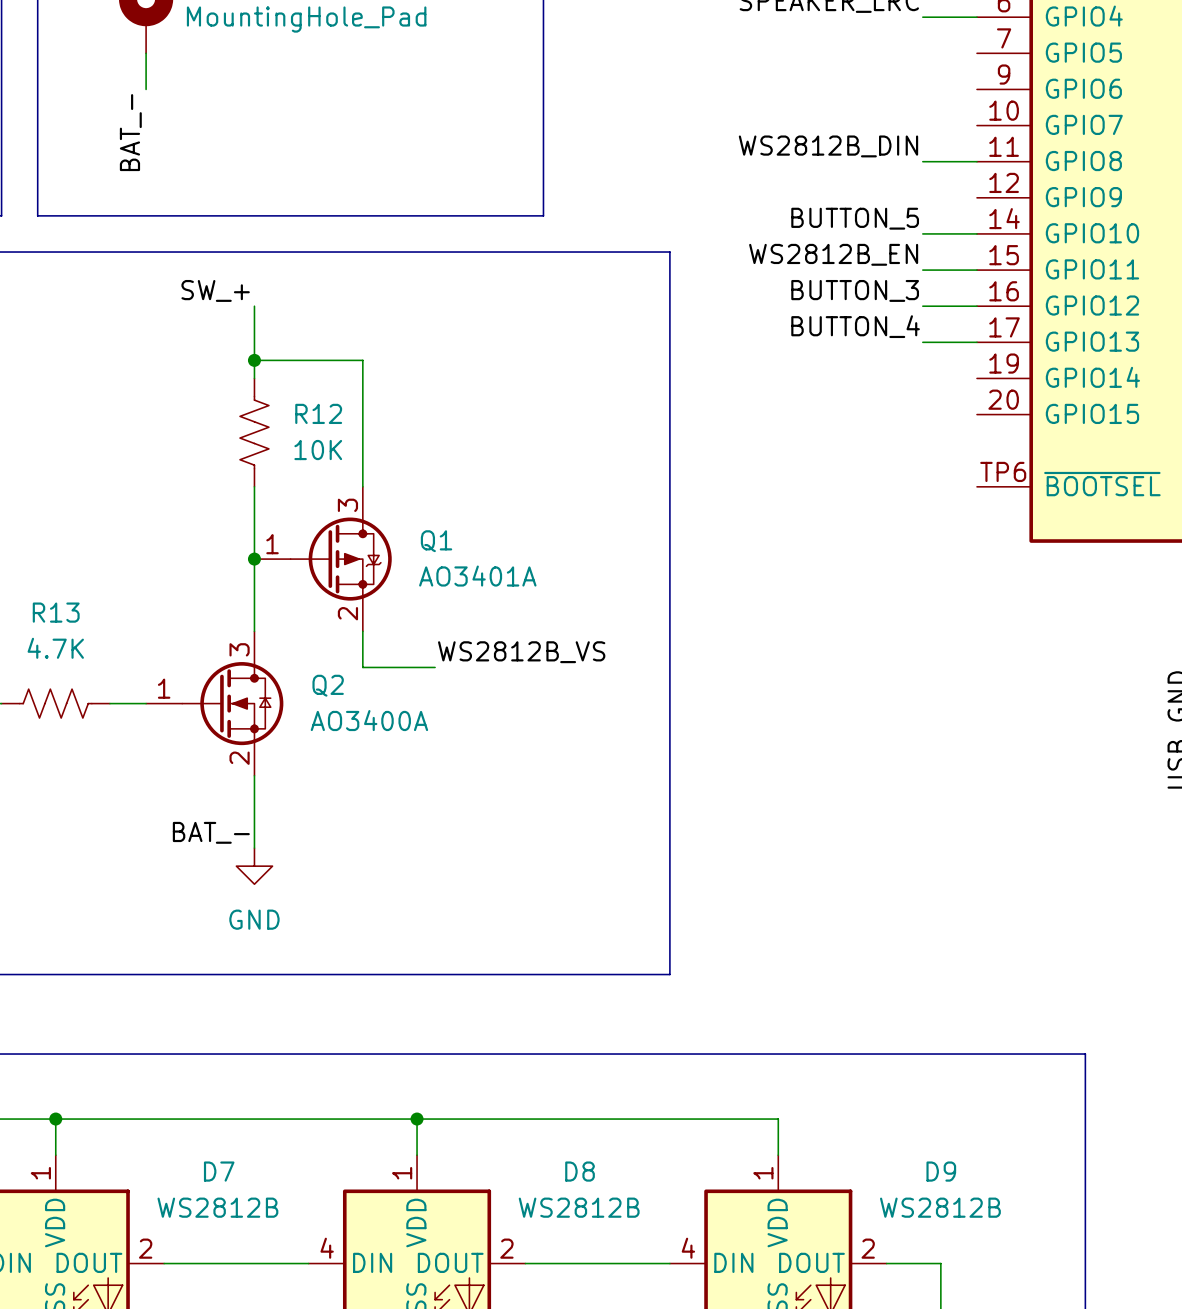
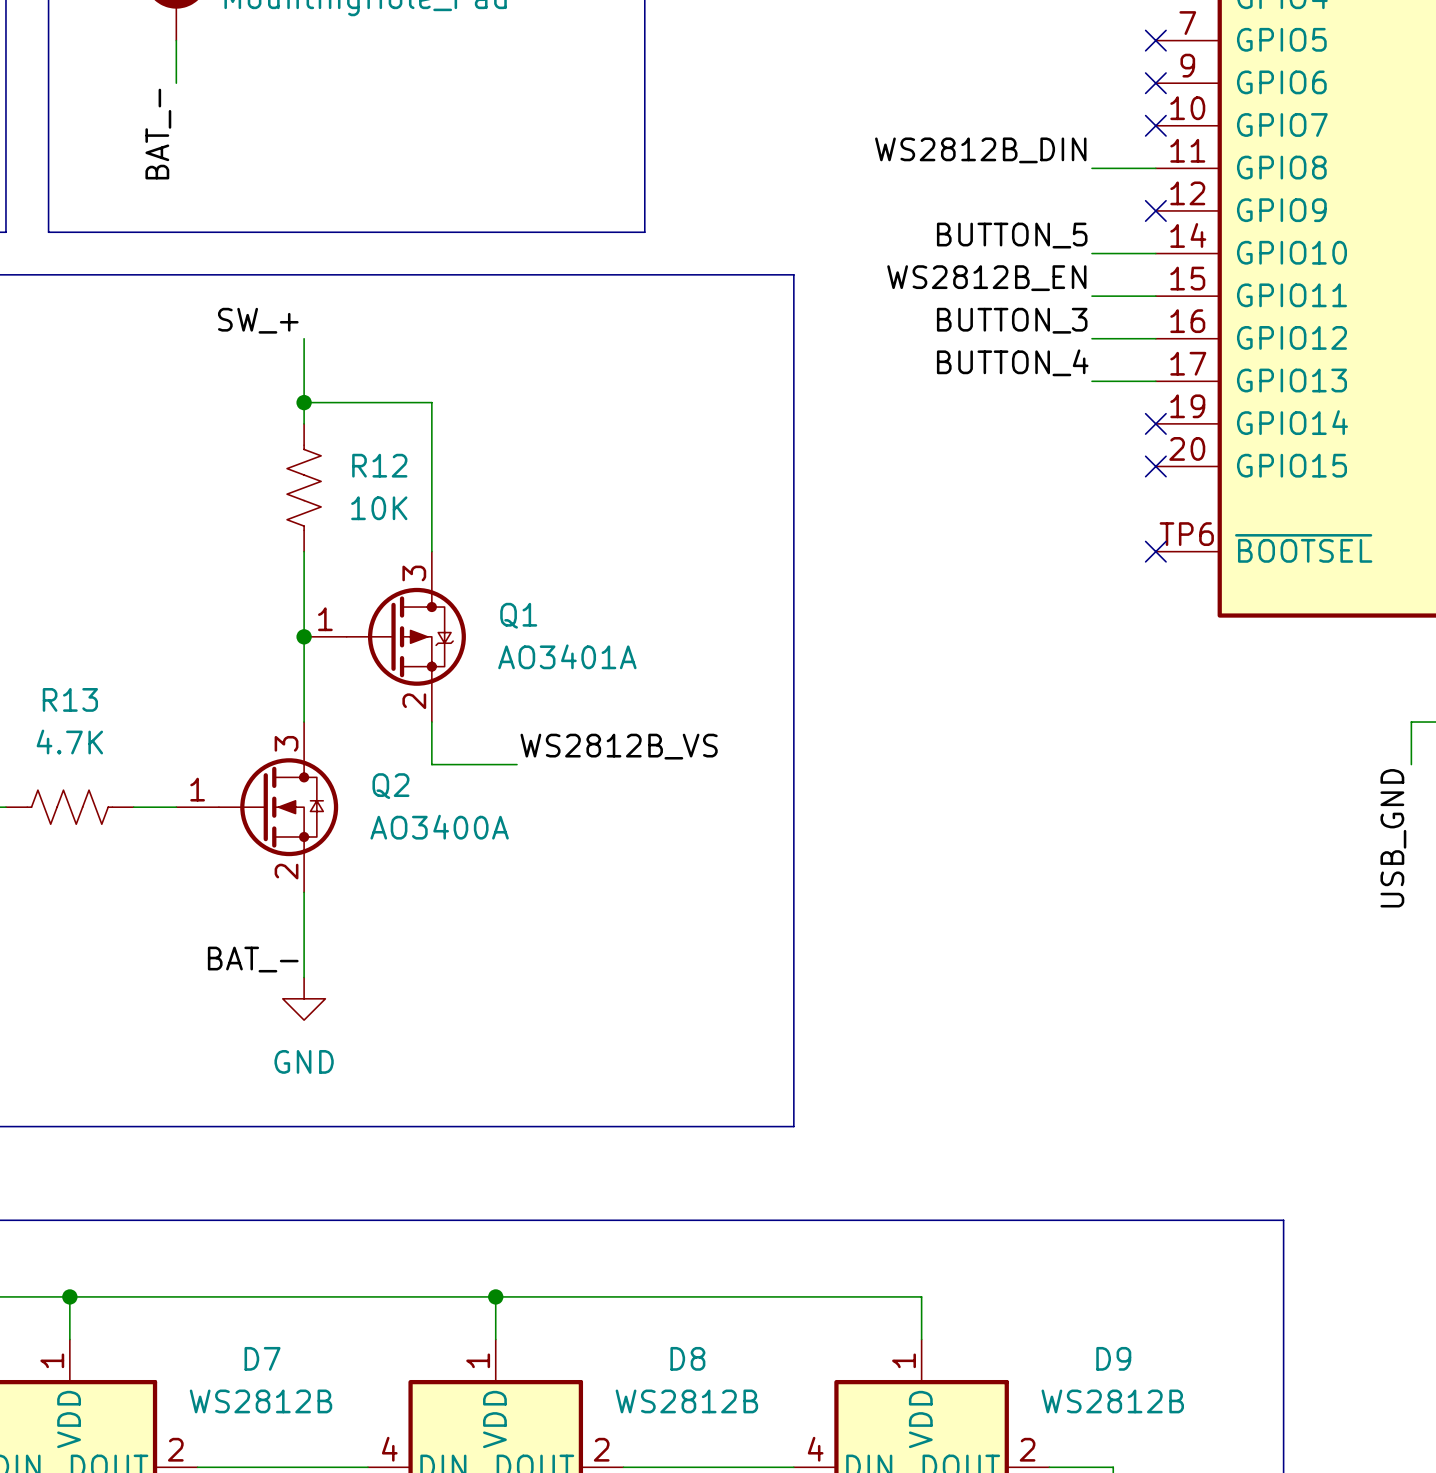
no-connect mark: none -> (1155, 40)
no-connect mark: none -> (1155, 83)
no-connect mark: none -> (1155, 125)
no-connect mark: none -> (1155, 210)
no-connect mark: none -> (1155, 423)
no-connect mark: none -> (1155, 466)
no-connect mark: none -> (1155, 551)

